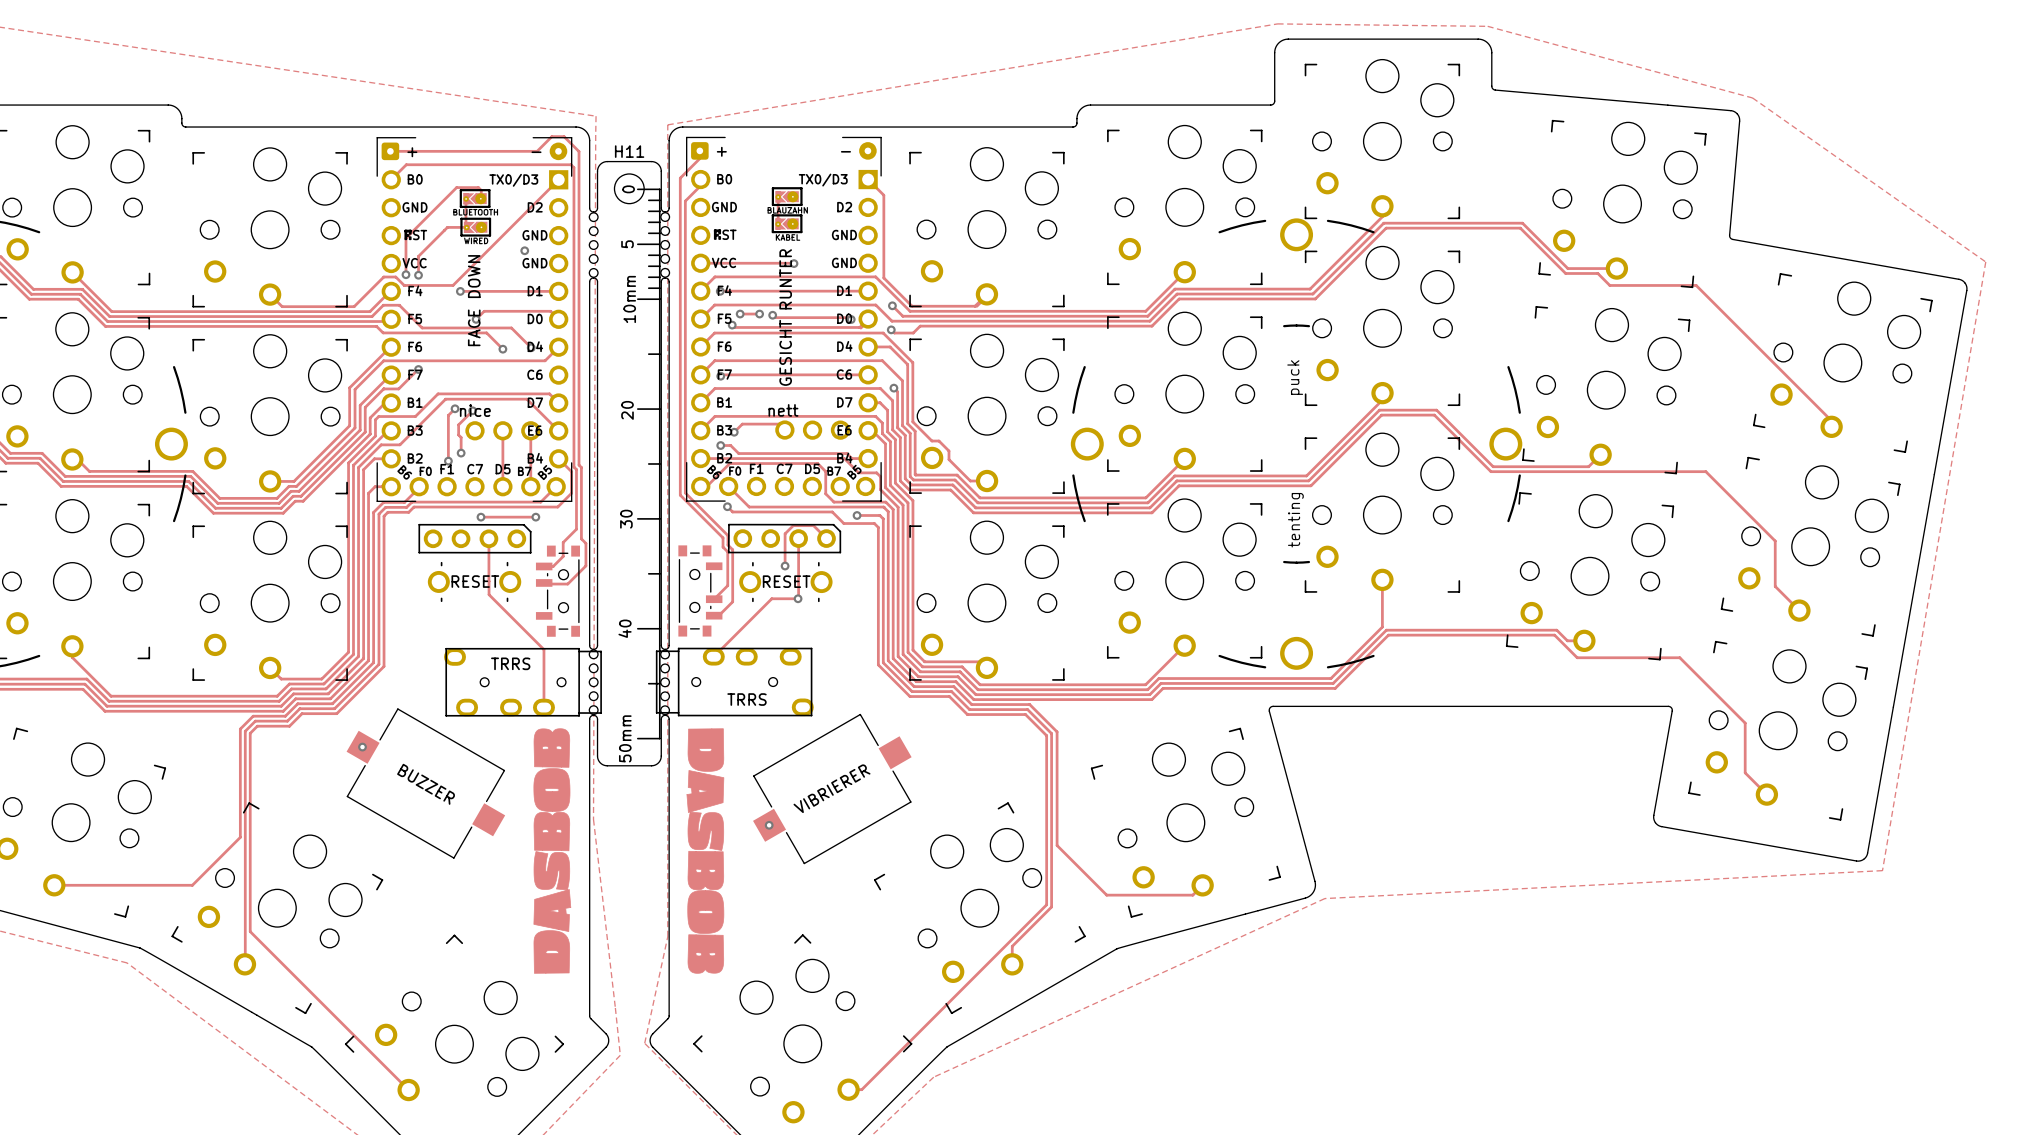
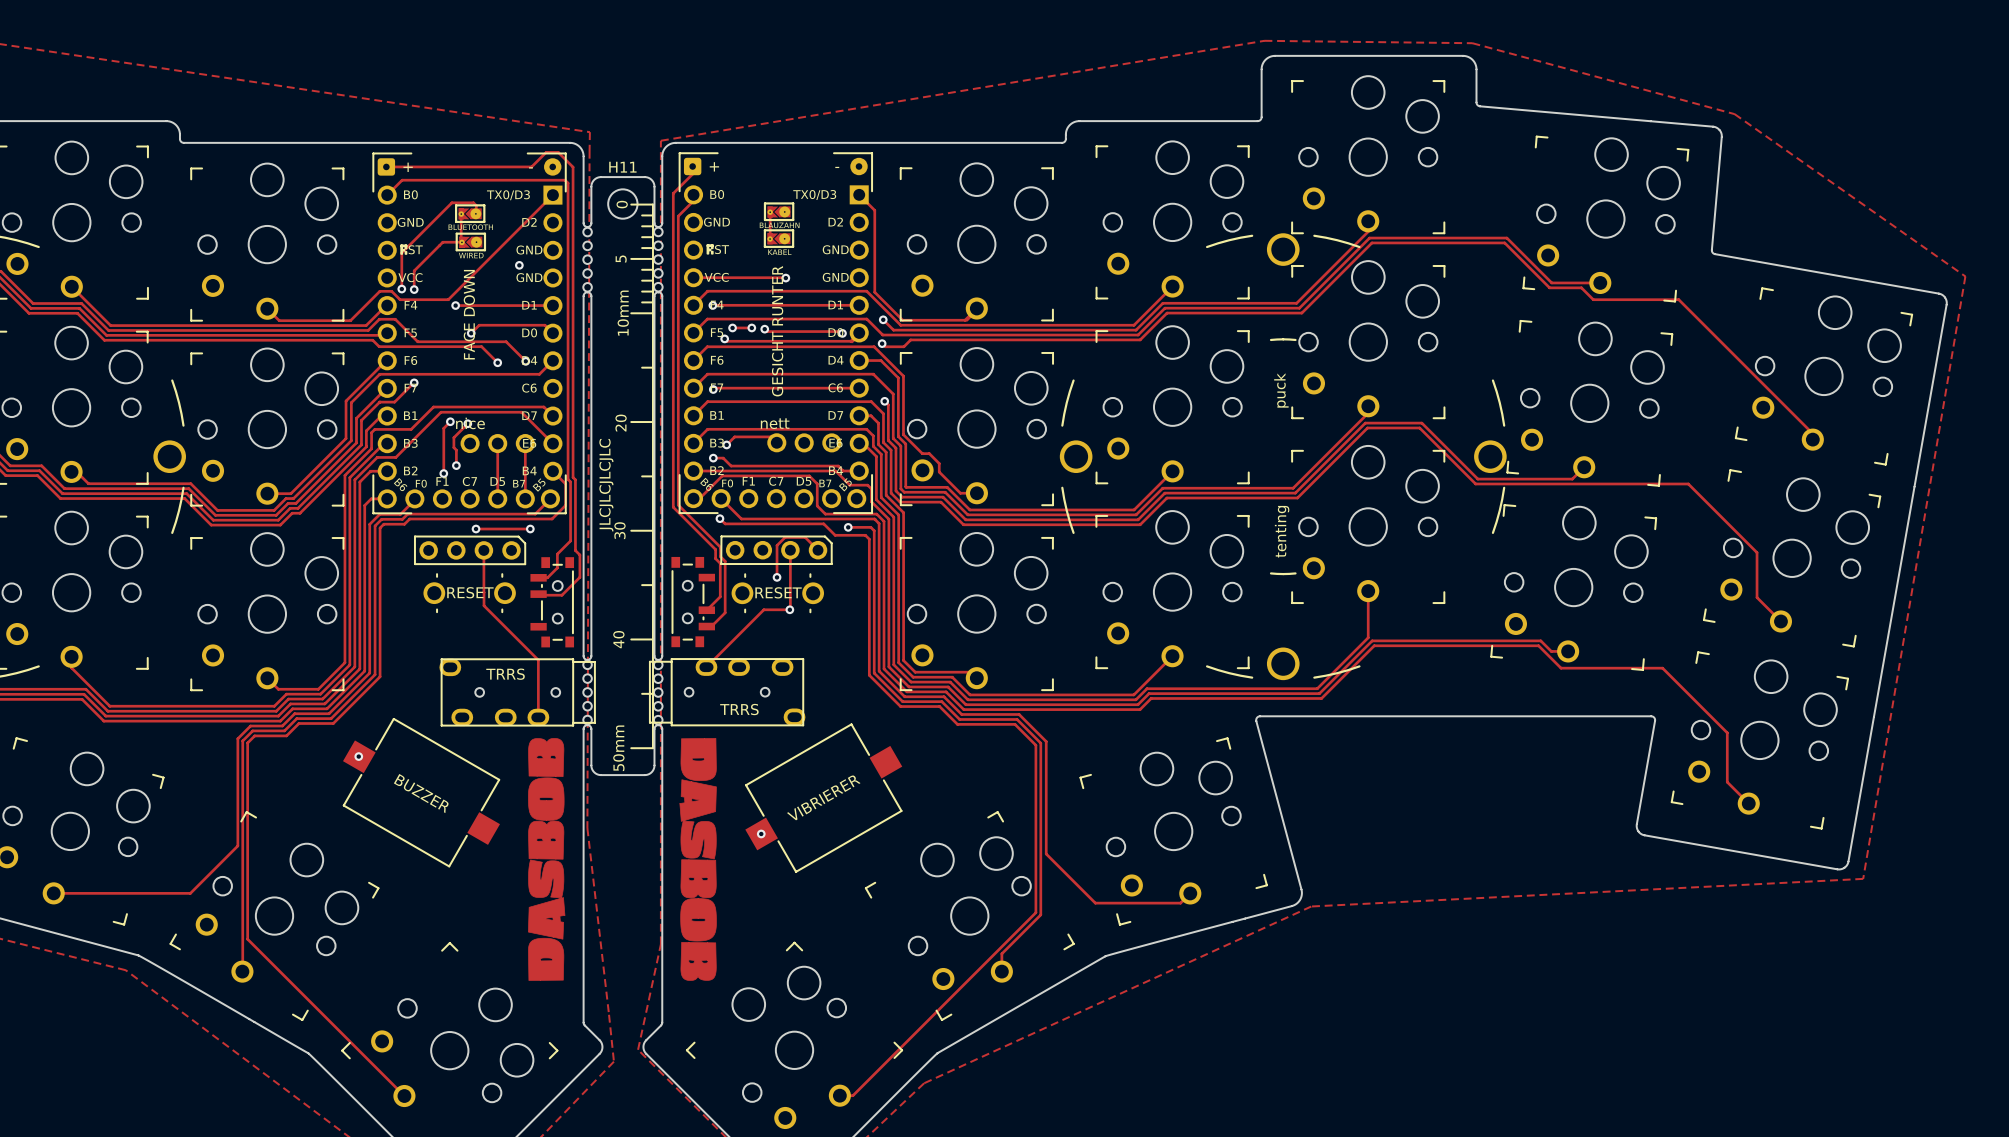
text: none -> JLCJLCJLCJLC (606, 485)

